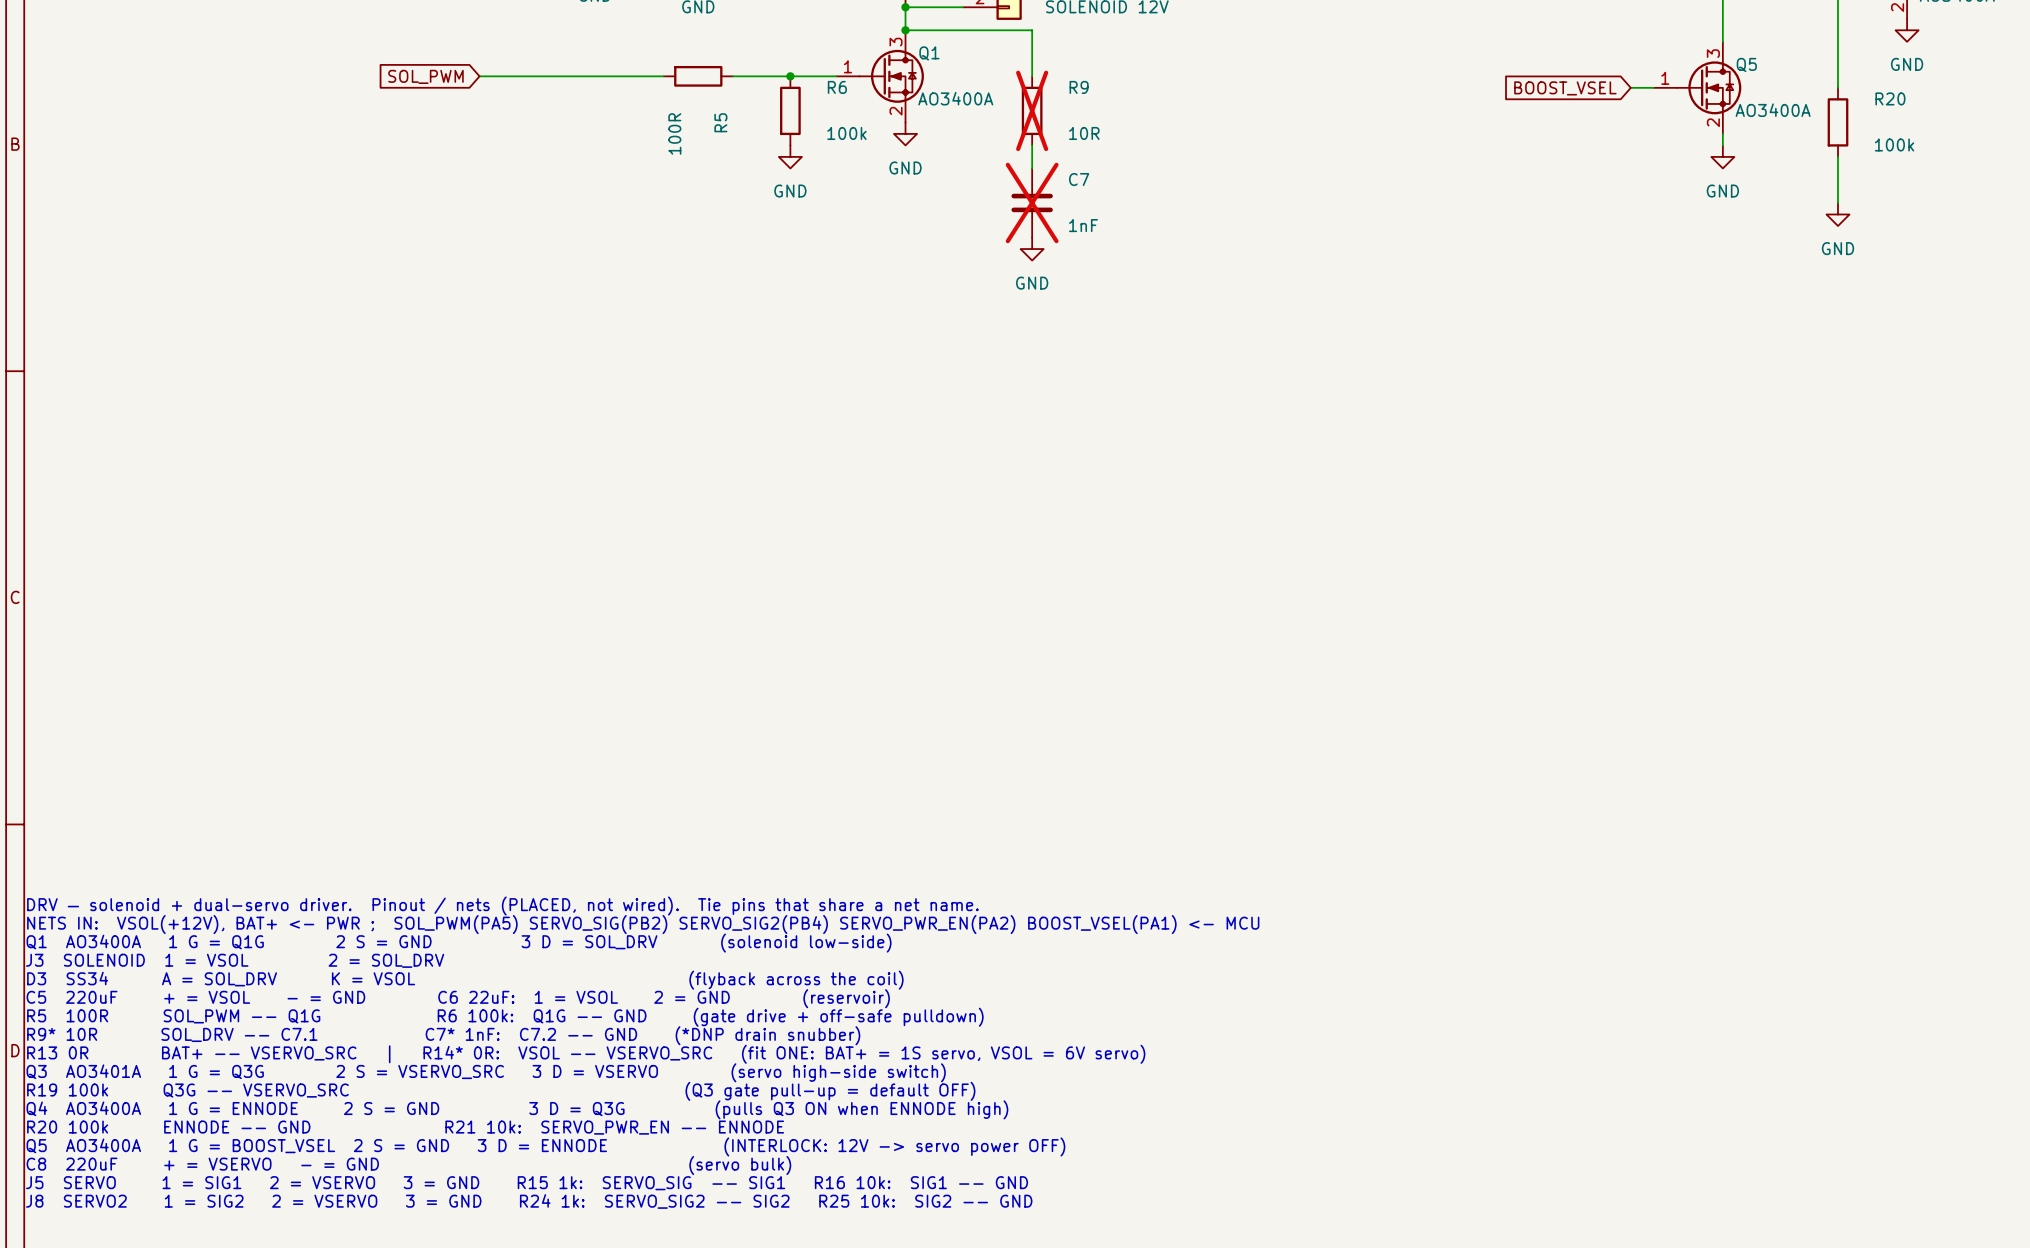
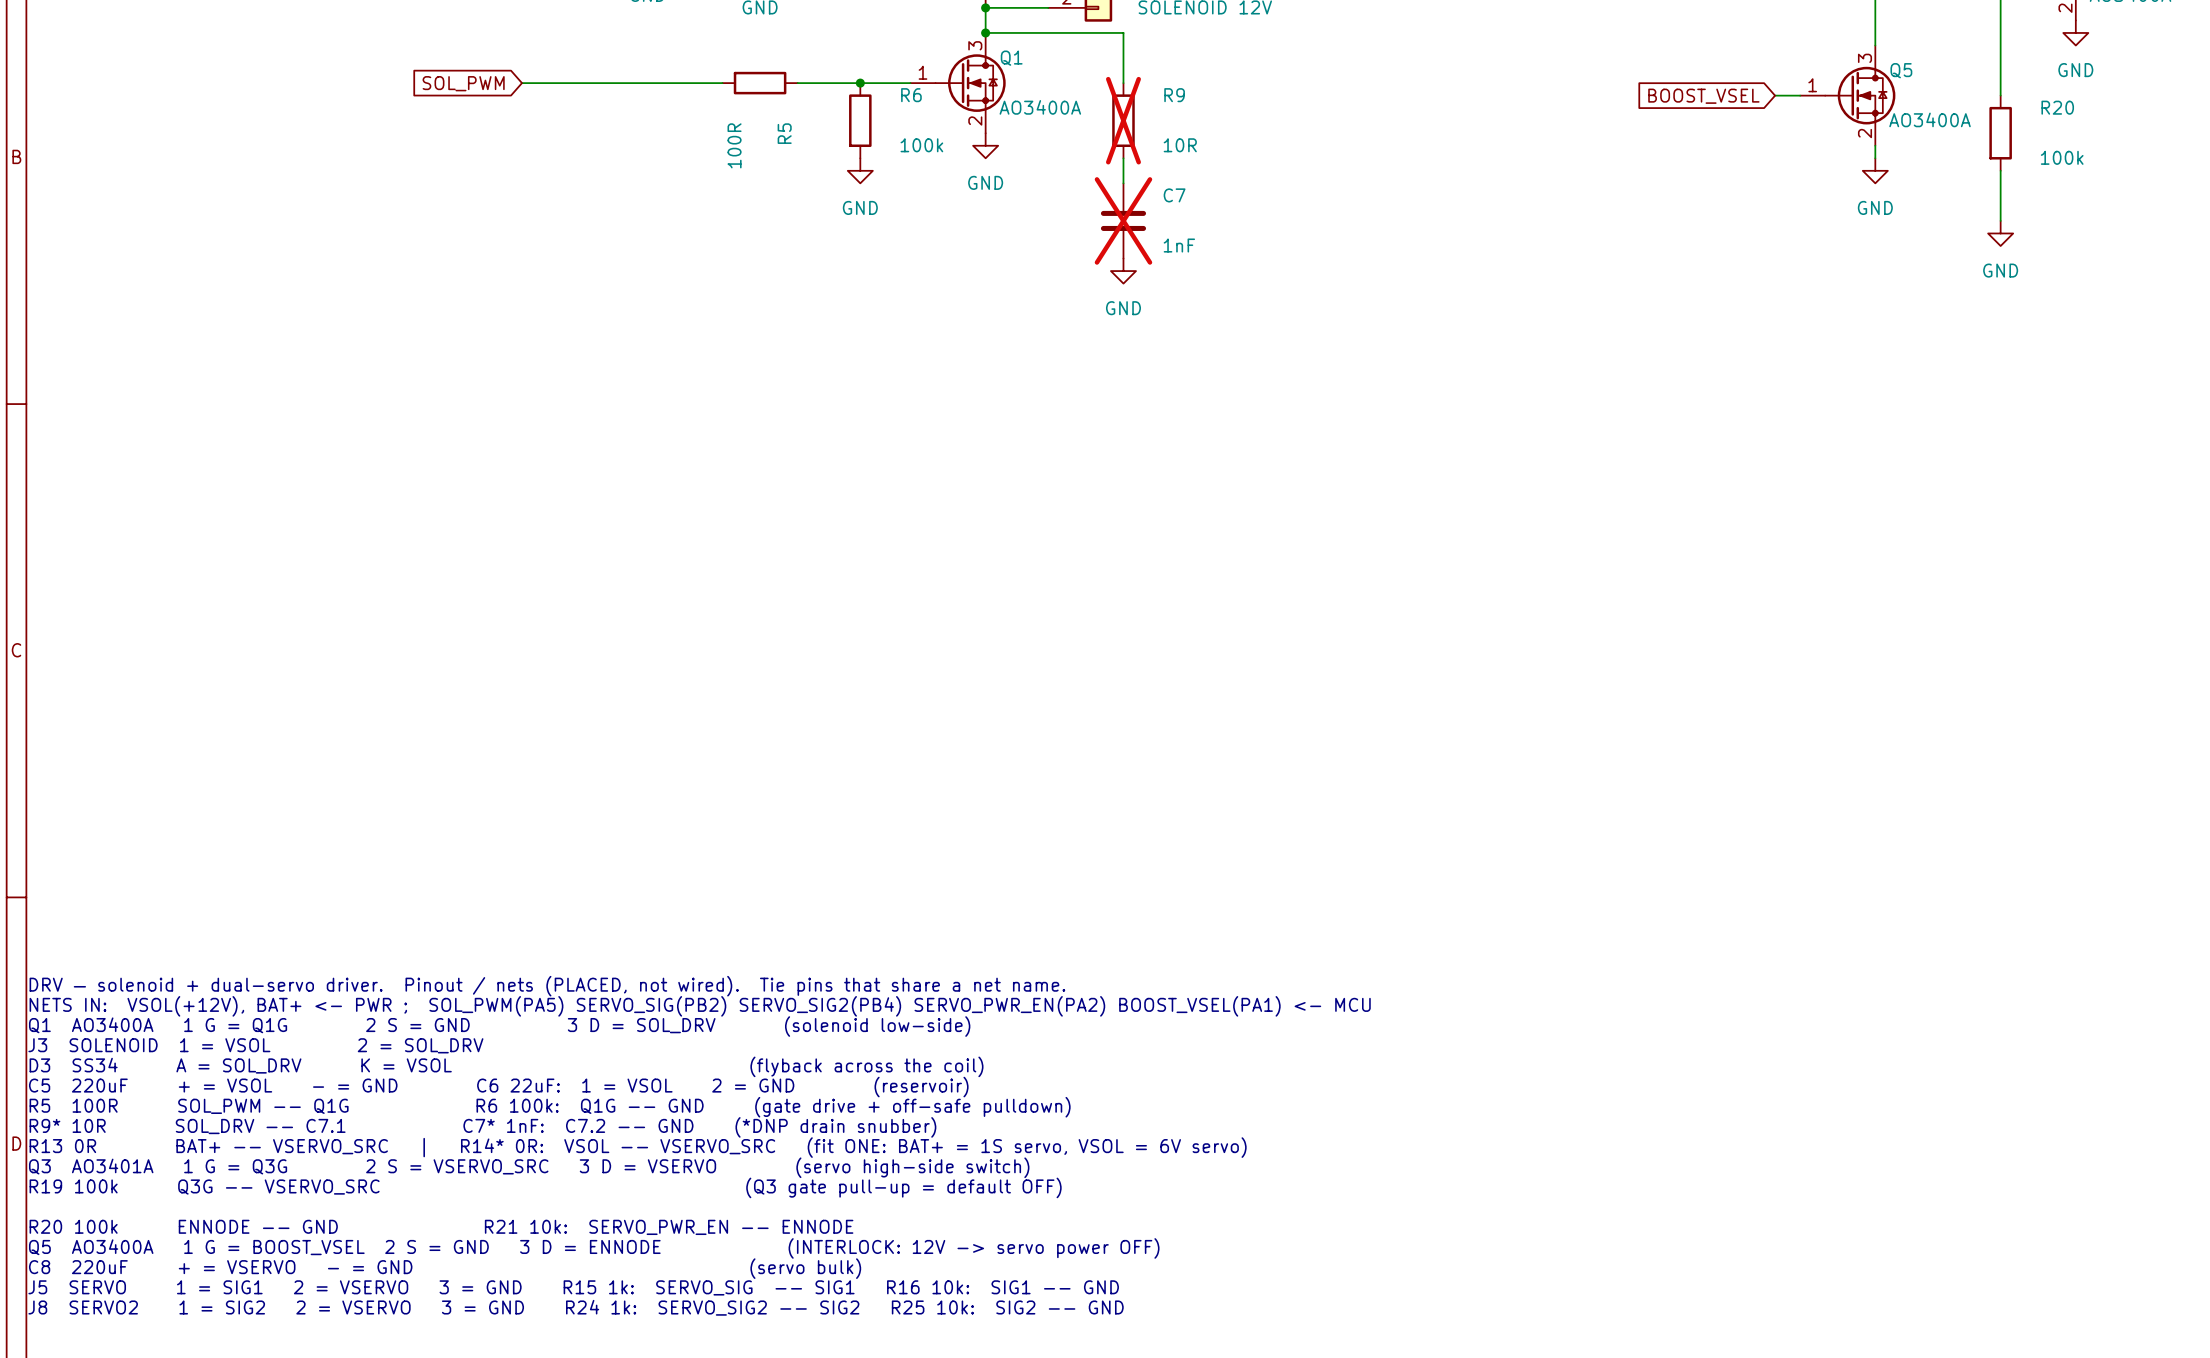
text: Q4 AO3400A 1 G = ENNODE 2 S = GND 3 D = Q3G (pulls Q3 ON when ENNODE high) (517, 1109) -> none

